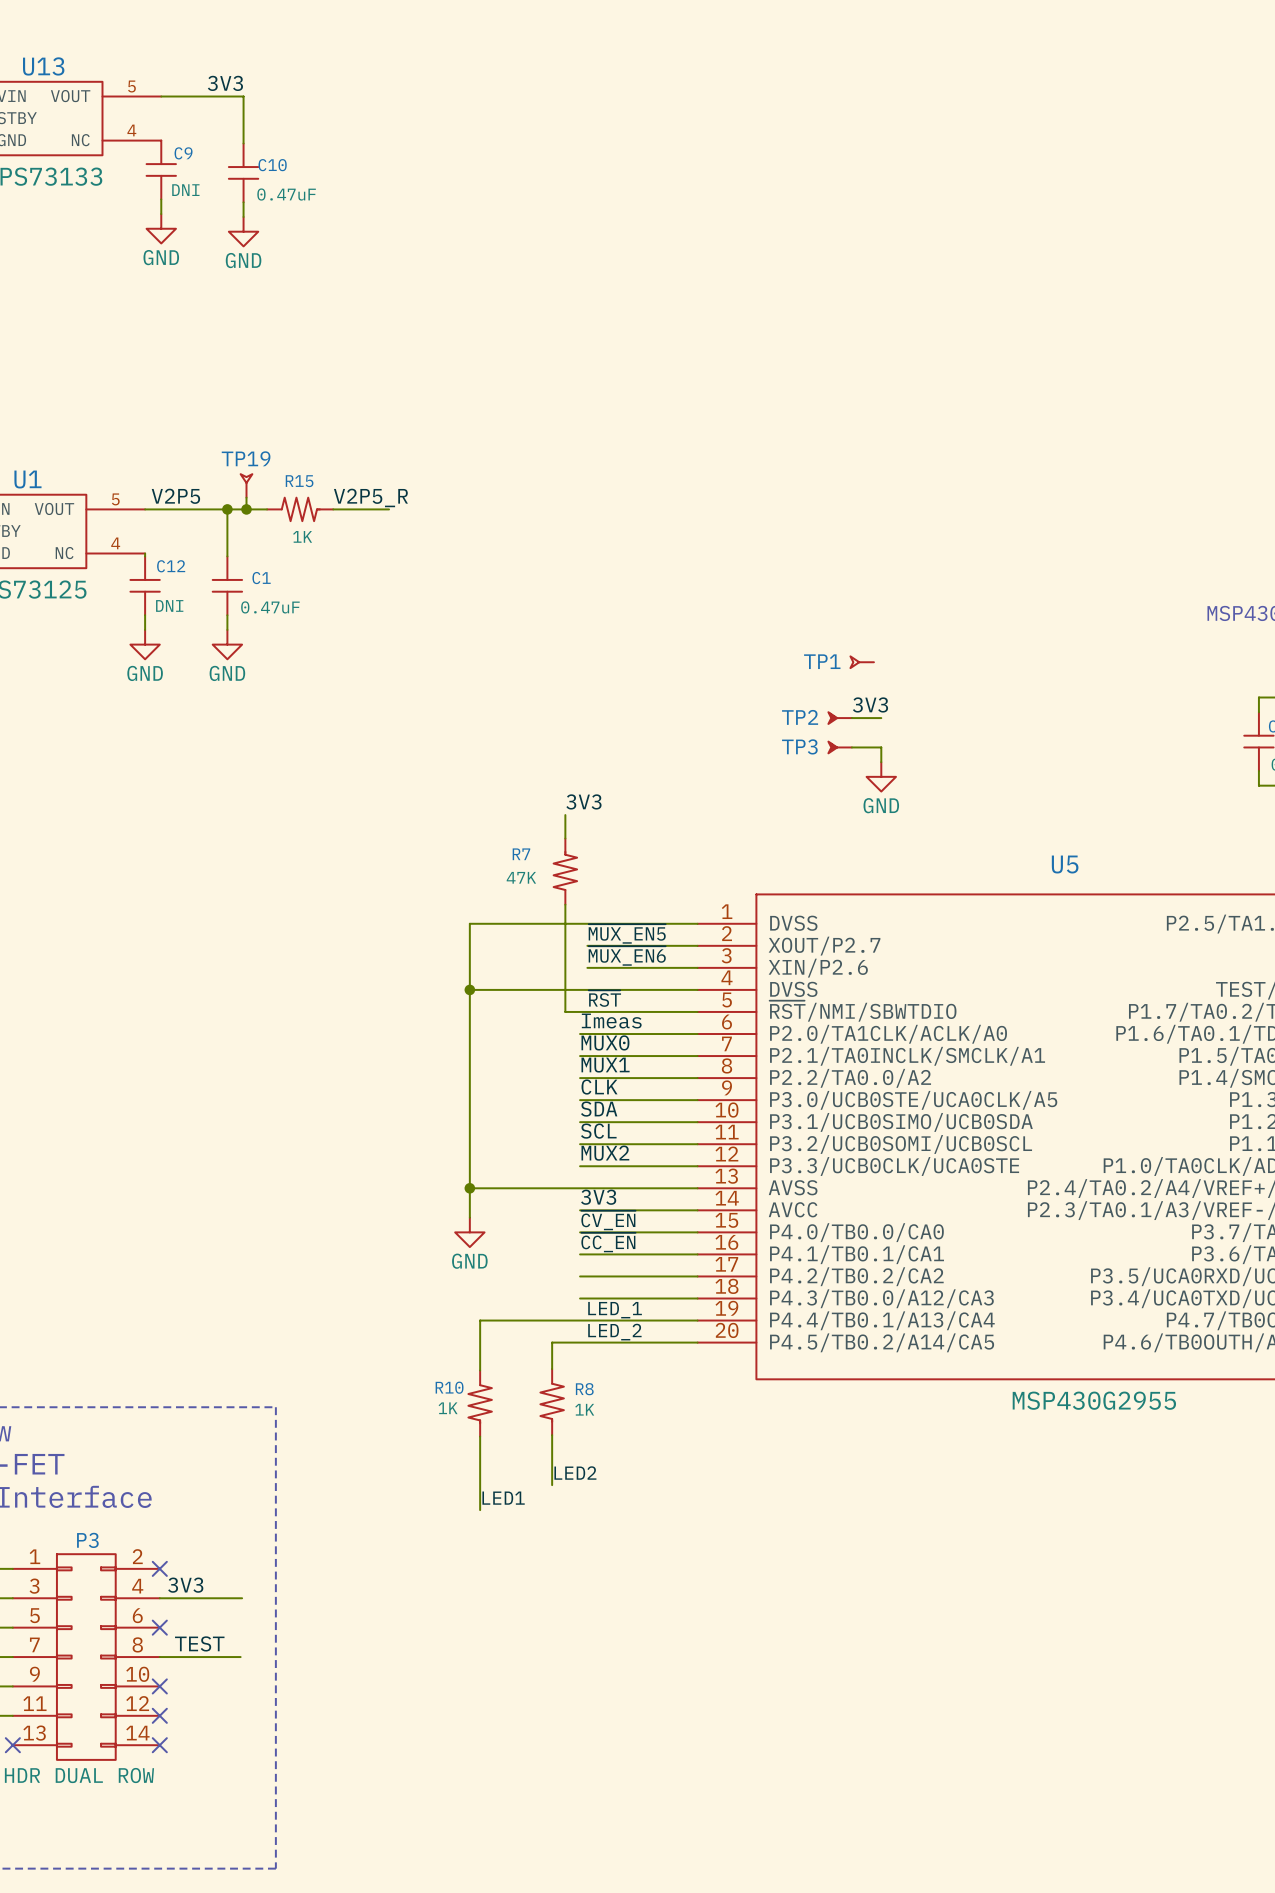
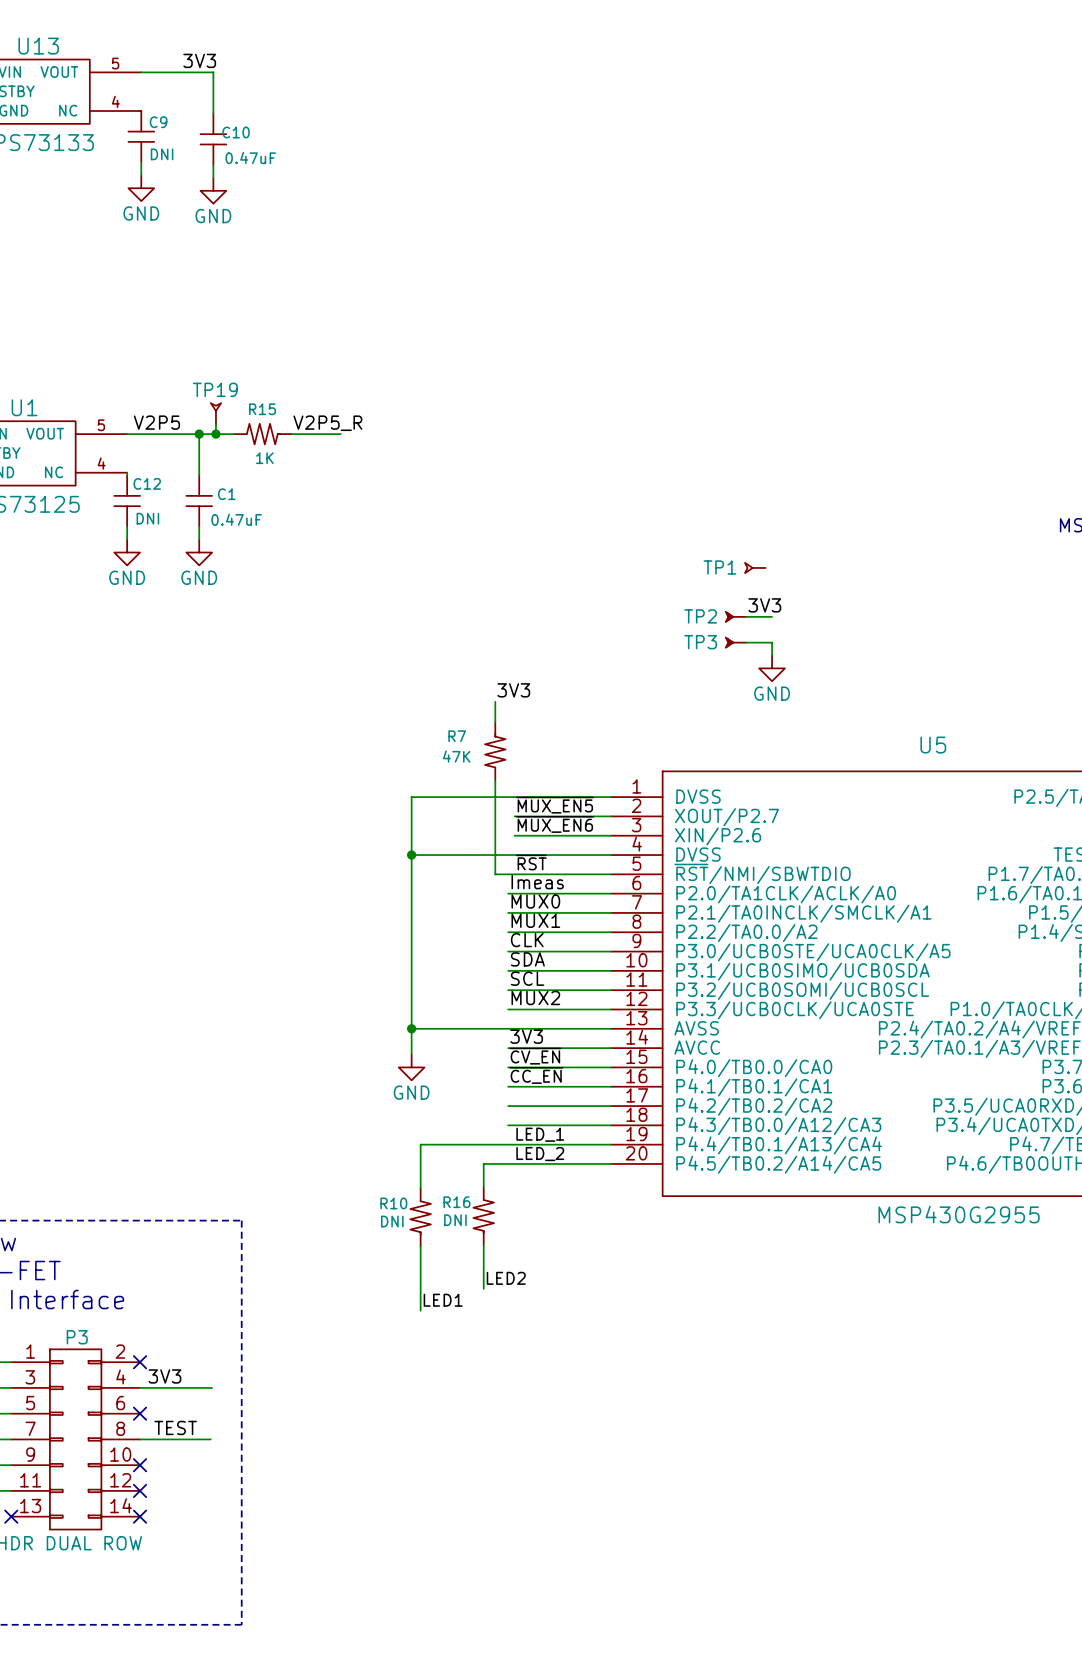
R8 name: R8 (584, 1389) -> R16 (456, 1202)
R10 value: 1K (448, 1408) -> DNI (392, 1221)
R8 value: 1K (584, 1409) -> DNI (455, 1220)

